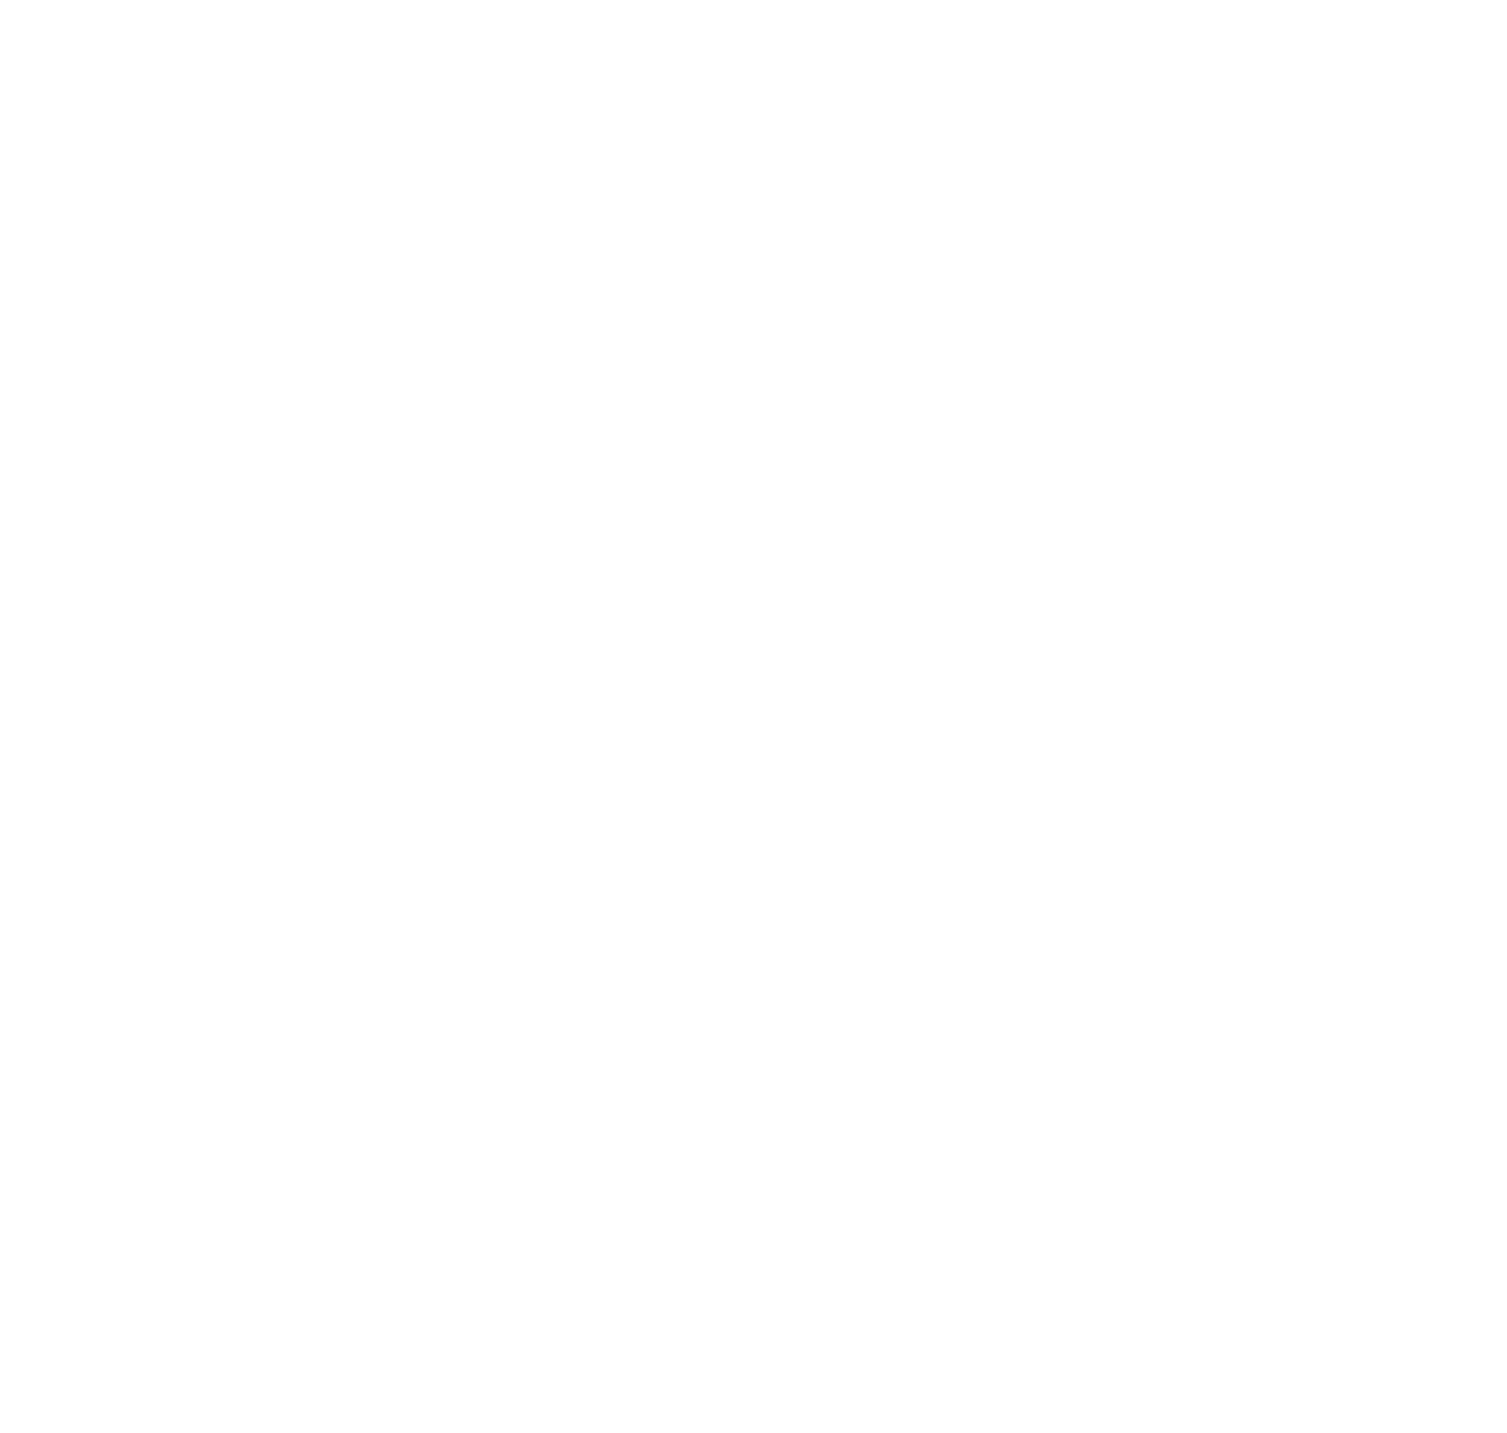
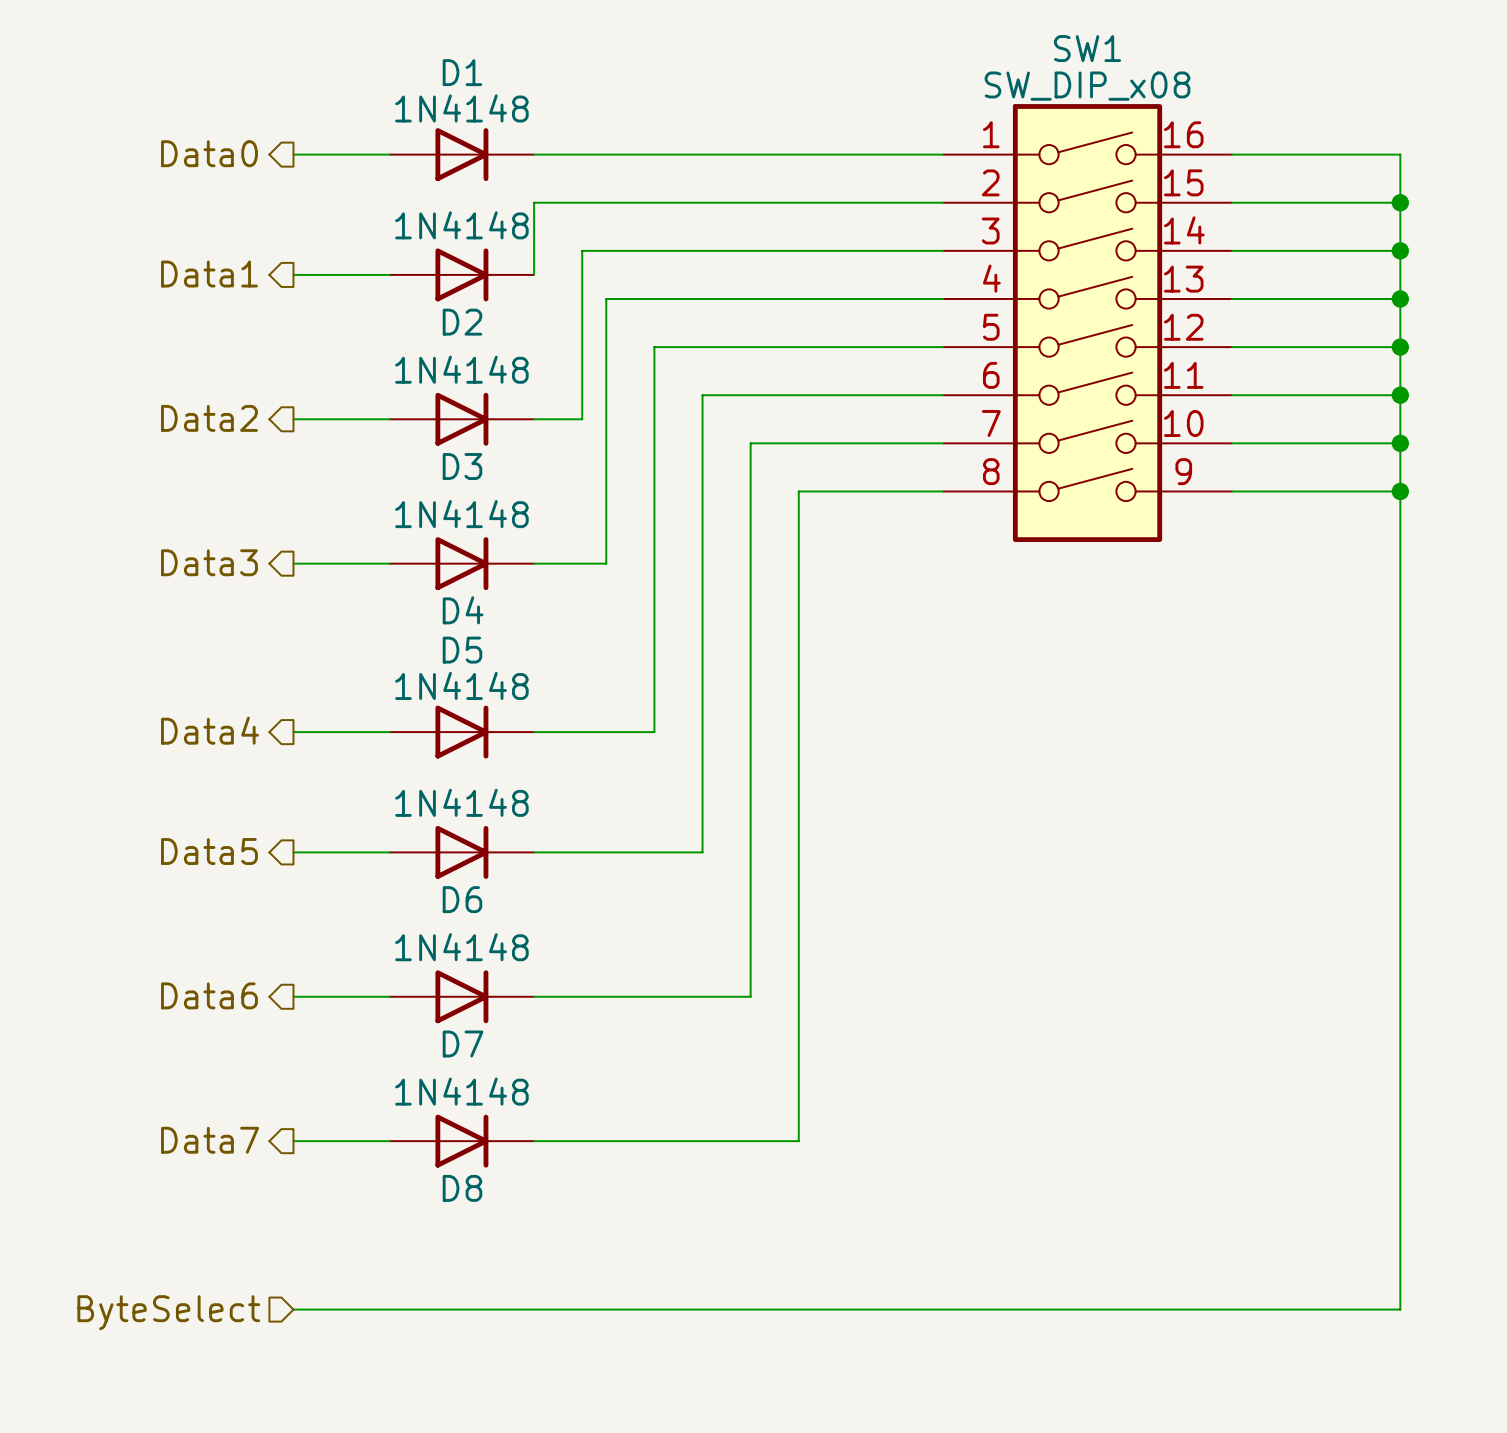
hierarchical label: none -> Data0 (209, 153)
wire: none -> (293, 154) (389, 154)
D1: none -> 1N4148 (461, 154)
wire: none -> (534, 154) (943, 154)
wire: none -> (1231, 154) (1400, 154) (1400, 1309) (293, 1309)
wire: none -> (943, 202) (534, 202) (534, 274)
wire: none -> (1231, 202) (1400, 202)
junction: none -> (1400, 202)
wire: none -> (943, 250) (582, 250) (582, 419) (534, 419)
wire: none -> (1231, 250) (1400, 250)
junction: none -> (1400, 250)
hierarchical label: none -> Data1 (209, 274)
wire: none -> (293, 274) (389, 274)
D2: none -> 1N4148 (461, 274)
wire: none -> (943, 298) (606, 298) (606, 563) (534, 563)
wire: none -> (1231, 298) (1400, 298)
junction: none -> (1400, 298)
SW1: none -> SW_DIP_x08 (1087, 323)
wire: none -> (943, 347) (654, 347) (654, 732) (534, 732)
wire: none -> (1231, 347) (1400, 347)
junction: none -> (1400, 347)
wire: none -> (943, 395) (702, 395) (702, 852) (534, 852)
wire: none -> (1231, 395) (1400, 395)
junction: none -> (1400, 395)
hierarchical label: none -> Data2 (209, 418)
wire: none -> (293, 419) (389, 419)
D3: none -> 1N4148 (461, 419)
wire: none -> (943, 443) (750, 443) (750, 996) (534, 996)
wire: none -> (1231, 443) (1400, 443)
junction: none -> (1400, 443)
wire: none -> (943, 491) (798, 491) (798, 1141) (534, 1141)
wire: none -> (1231, 491) (1400, 491)
junction: none -> (1400, 491)
hierarchical label: none -> Data3 (209, 562)
wire: none -> (293, 563) (389, 563)
D4: none -> 1N4148 (461, 563)
hierarchical label: none -> Data4 (210, 730)
wire: none -> (293, 732) (389, 732)
D5: none -> 1N4148 (461, 732)
hierarchical label: none -> Data5 (209, 851)
wire: none -> (293, 852) (389, 852)
D6: none -> 1N4148 (461, 852)
hierarchical label: none -> Data6 (209, 995)
wire: none -> (293, 996) (389, 996)
D7: none -> 1N4148 (461, 996)
hierarchical label: none -> Data7 (210, 1140)
wire: none -> (293, 1141) (389, 1141)
D8: none -> 1N4148 (461, 1141)
hierarchical label: none -> ByteSelect (168, 1312)

